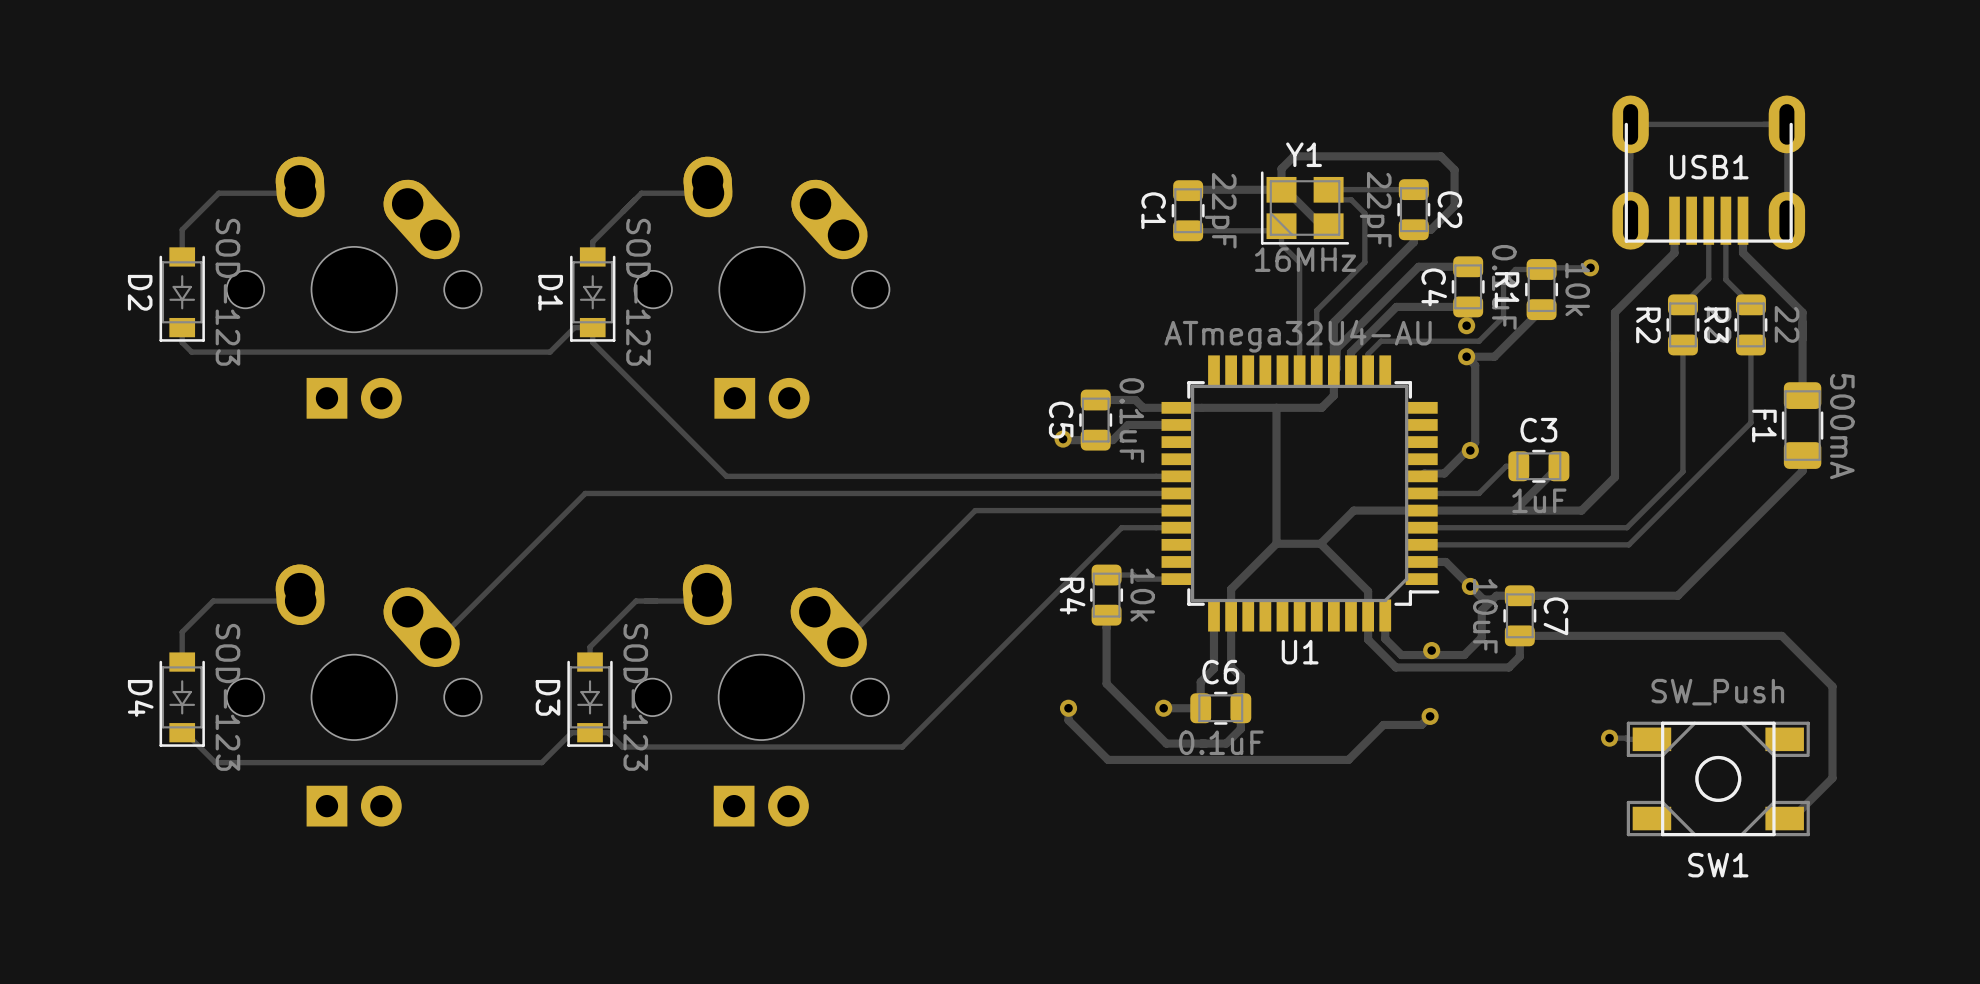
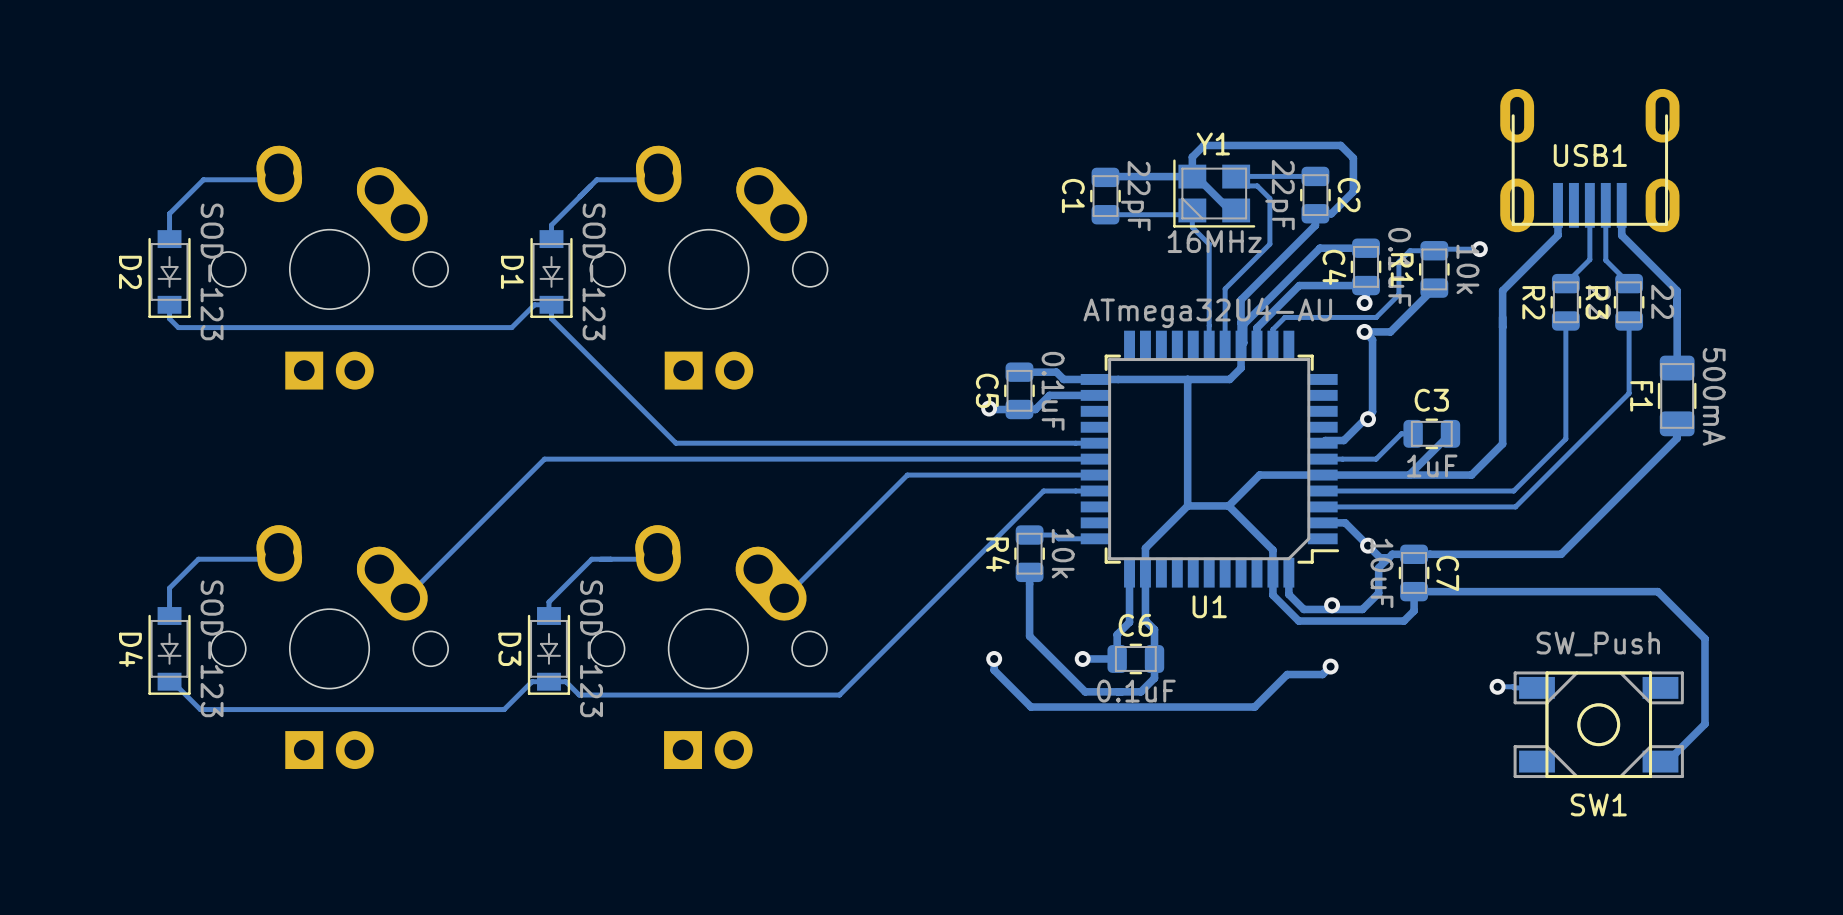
track: (1786, 220) (1786, 124) (1630, 124) (1630, 220) -> none

